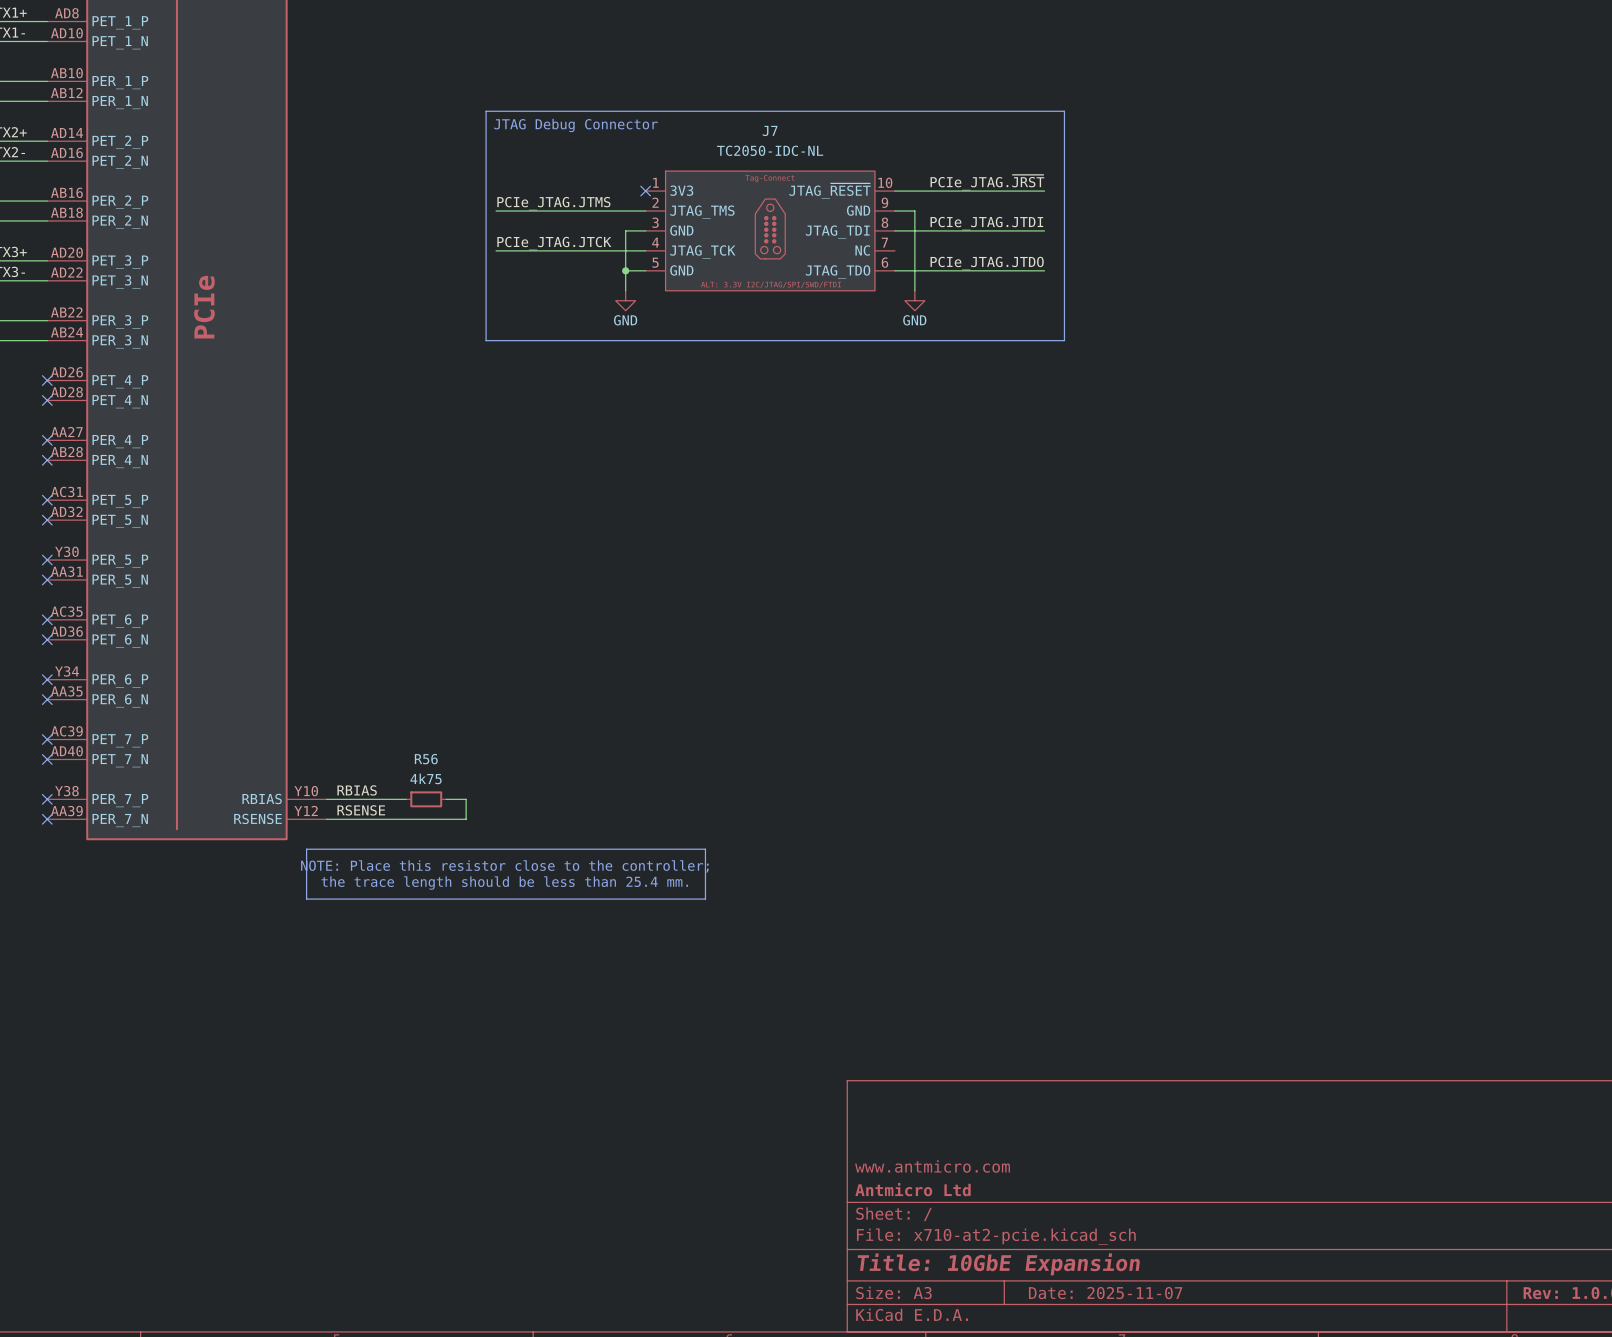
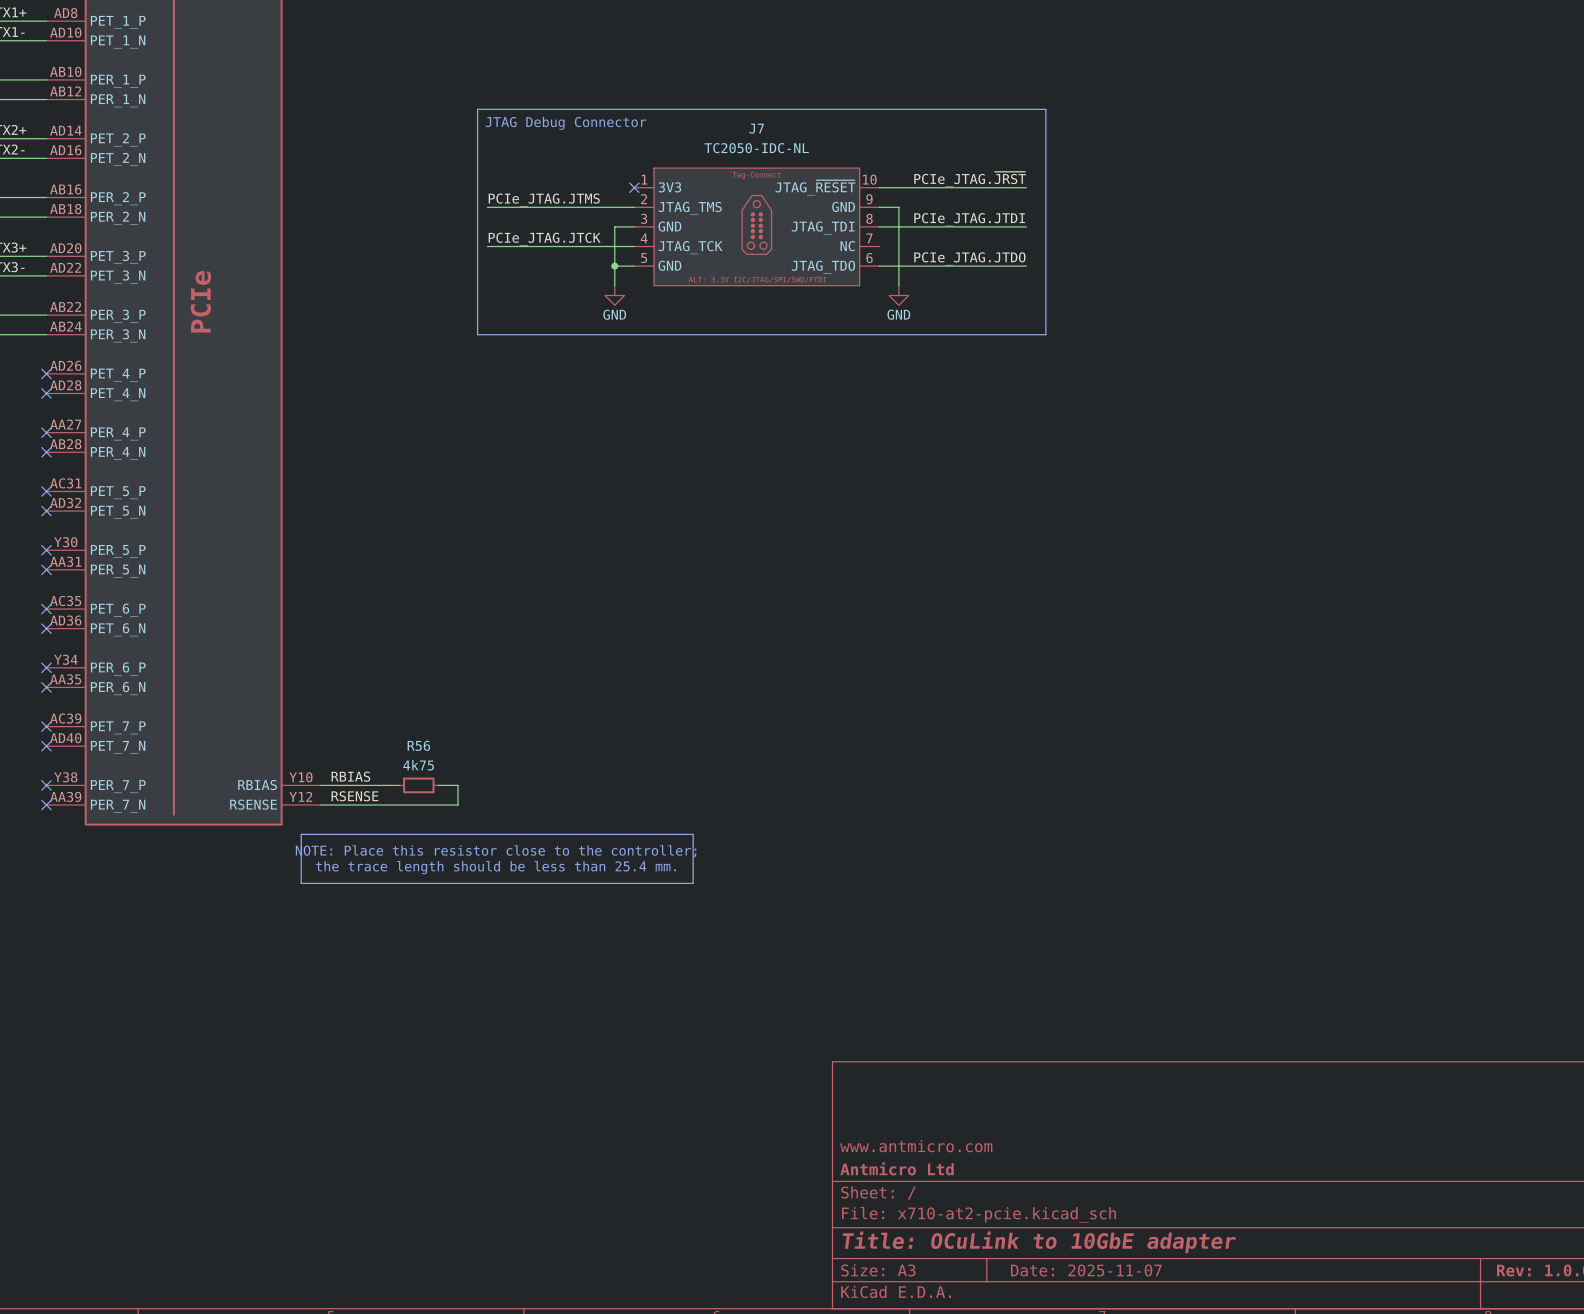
title block: Title: 10GbE Expansion (998, 1264) -> Title: OCuLink to 10GbE adapter (1039, 1242)

